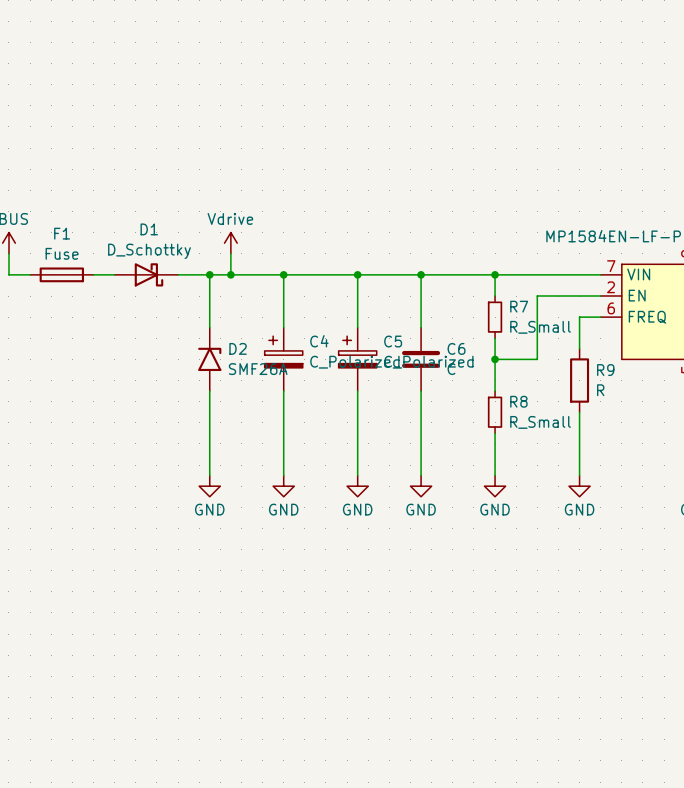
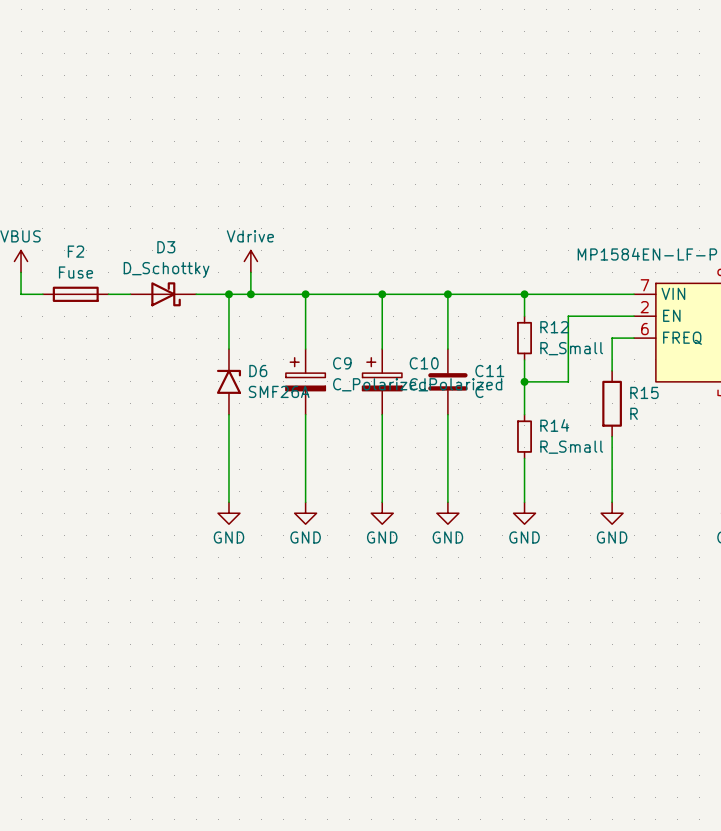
D1 name: D1 (149, 229) -> D3 (166, 247)
F1 name: F1 (62, 233) -> F2 (76, 251)
R7 name: R7 (519, 306) -> R12 (554, 327)
C4 name: C4 (319, 341) -> C9 (342, 363)
C5 name: C5 (393, 341) -> C10 (424, 363)
D2 name: D2 (238, 348) -> D6 (258, 371)
C6 name: C6 (456, 348) -> C11 (489, 371)
R9 name: R9 (605, 370) -> R15 (644, 392)
R8 name: R8 (518, 401) -> R14 (554, 425)

